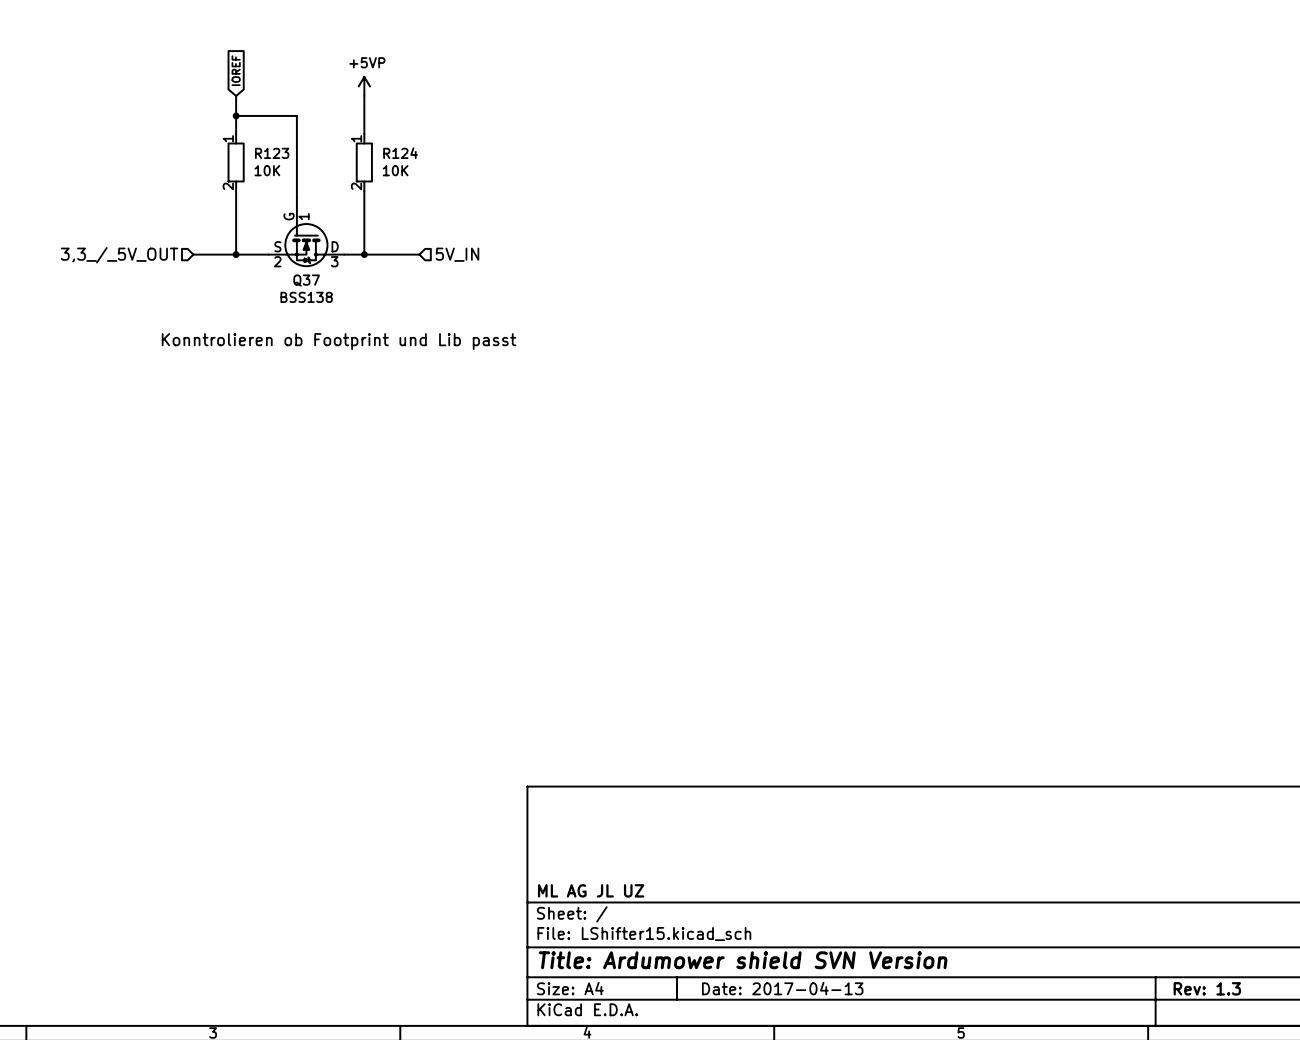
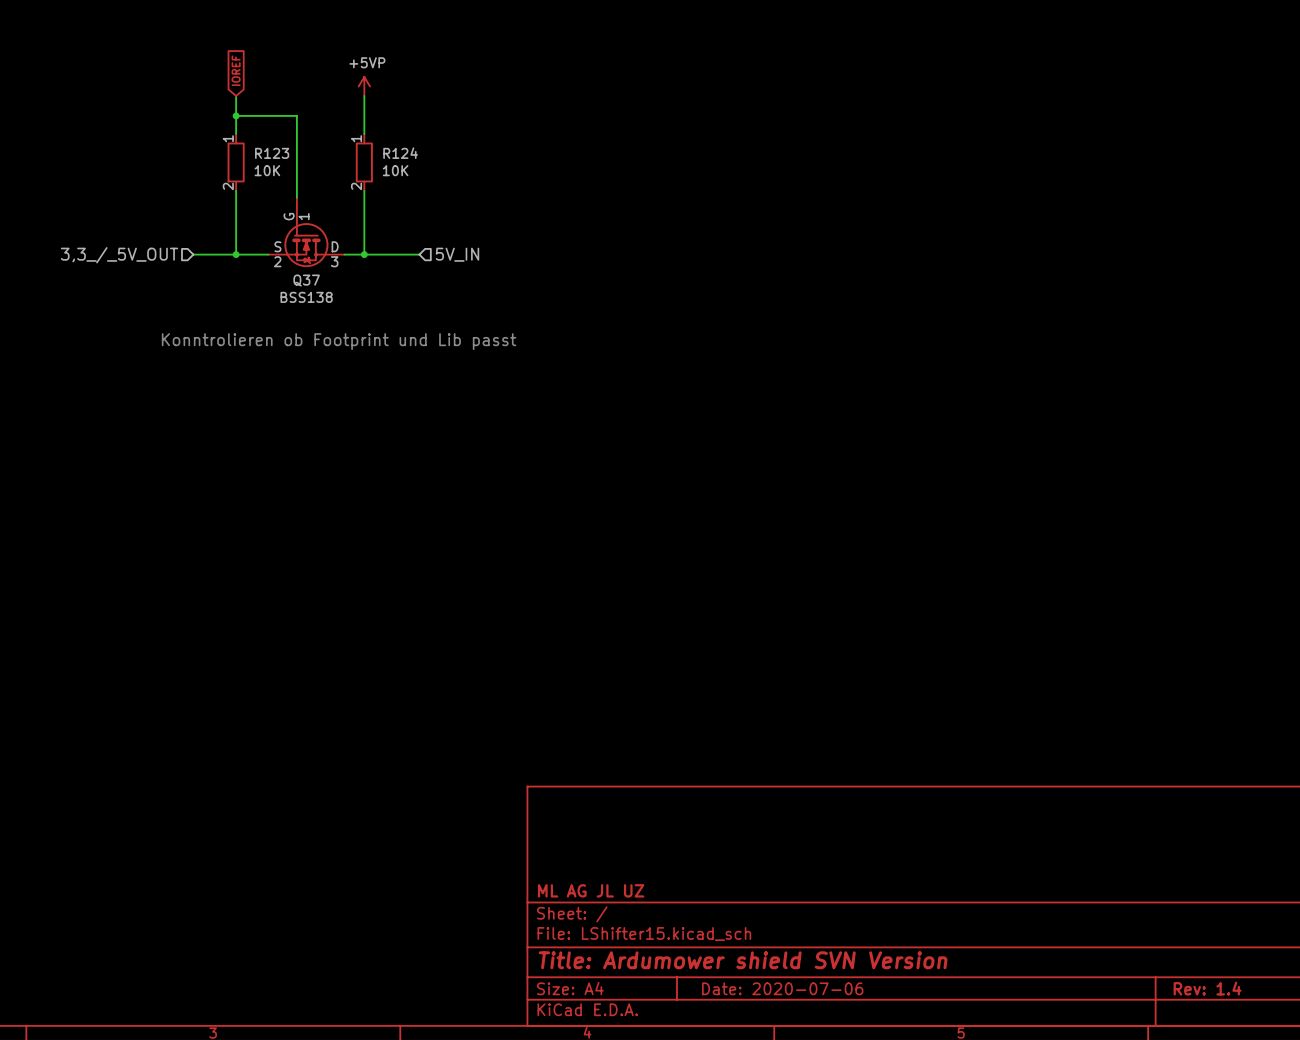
title block: Date: 2017-04-13 (782, 988) -> Date: 2020-07-06 (782, 988)
title block: Rev: 1.3 (1207, 988) -> Rev: 1.4 (1207, 988)

